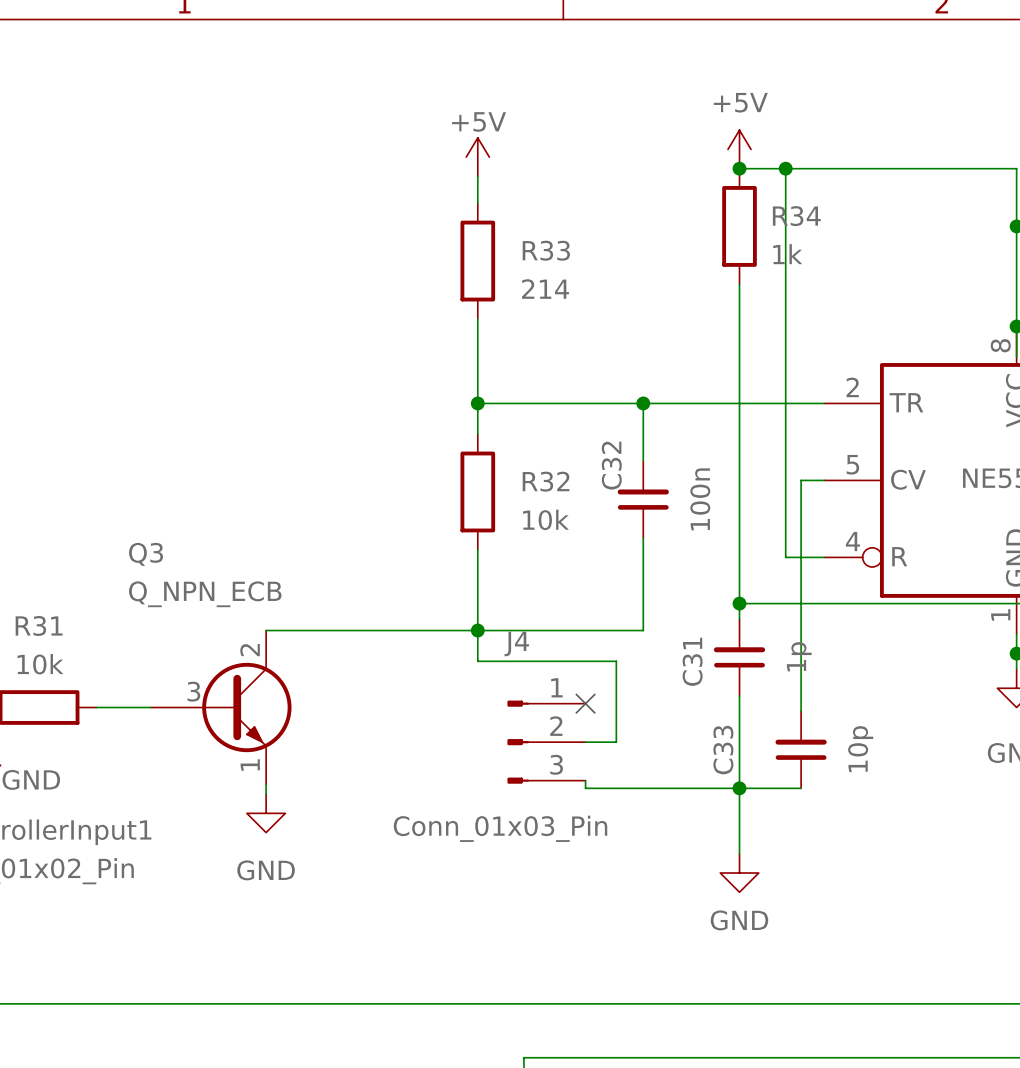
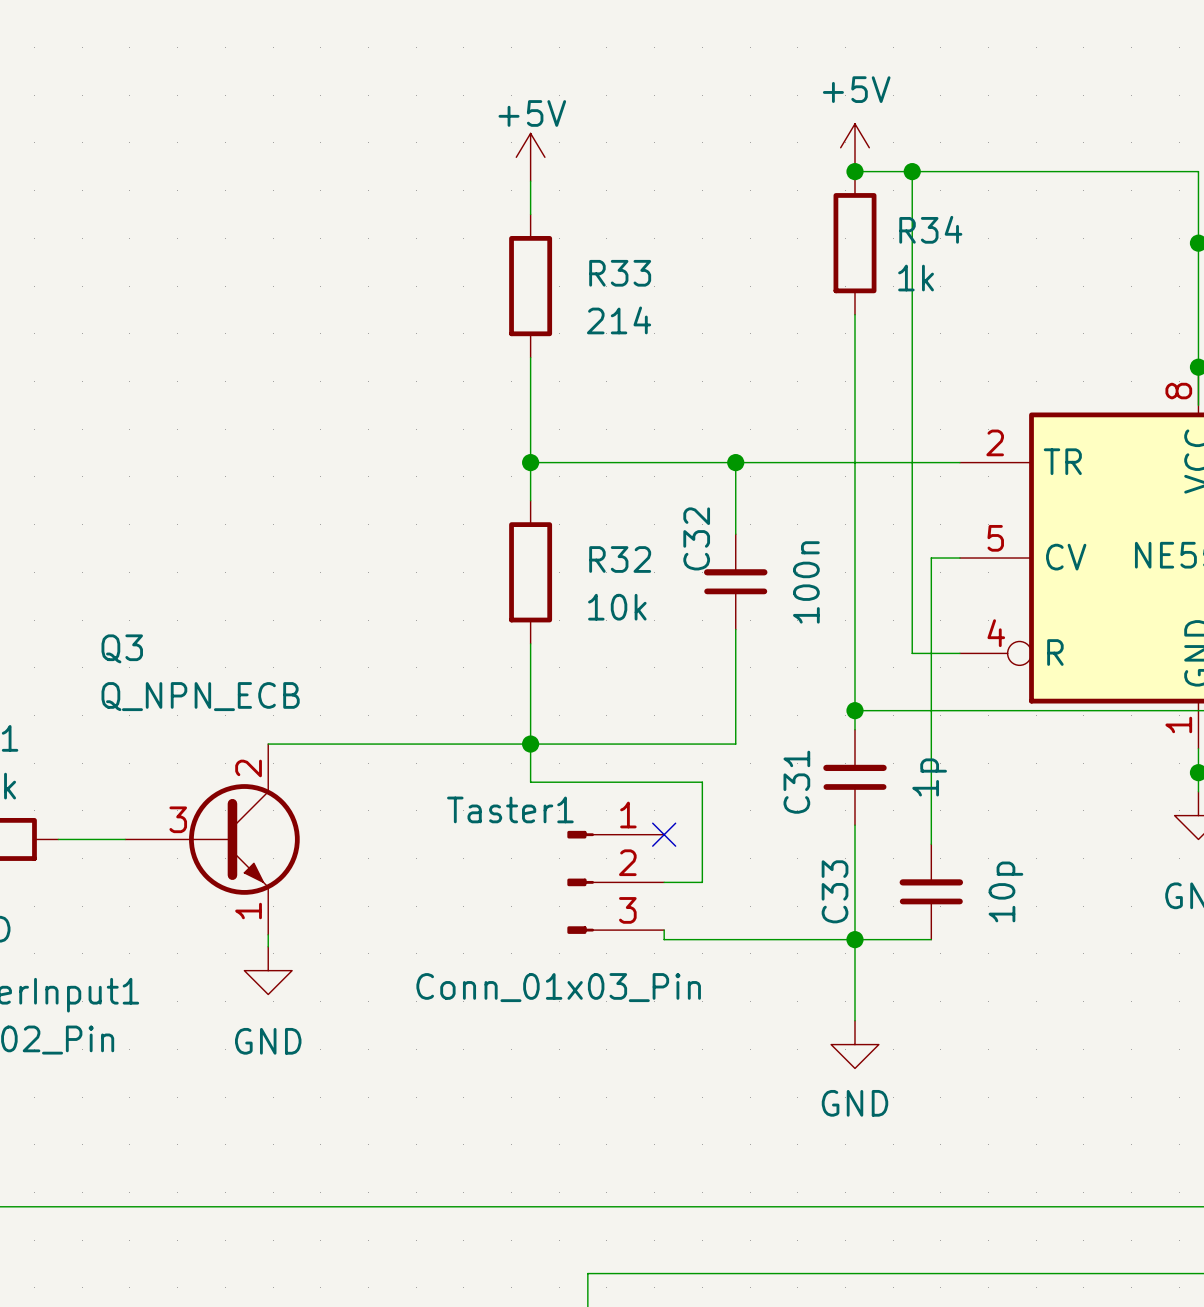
J4 name: J4 (516, 644) -> Taster1 (510, 809)

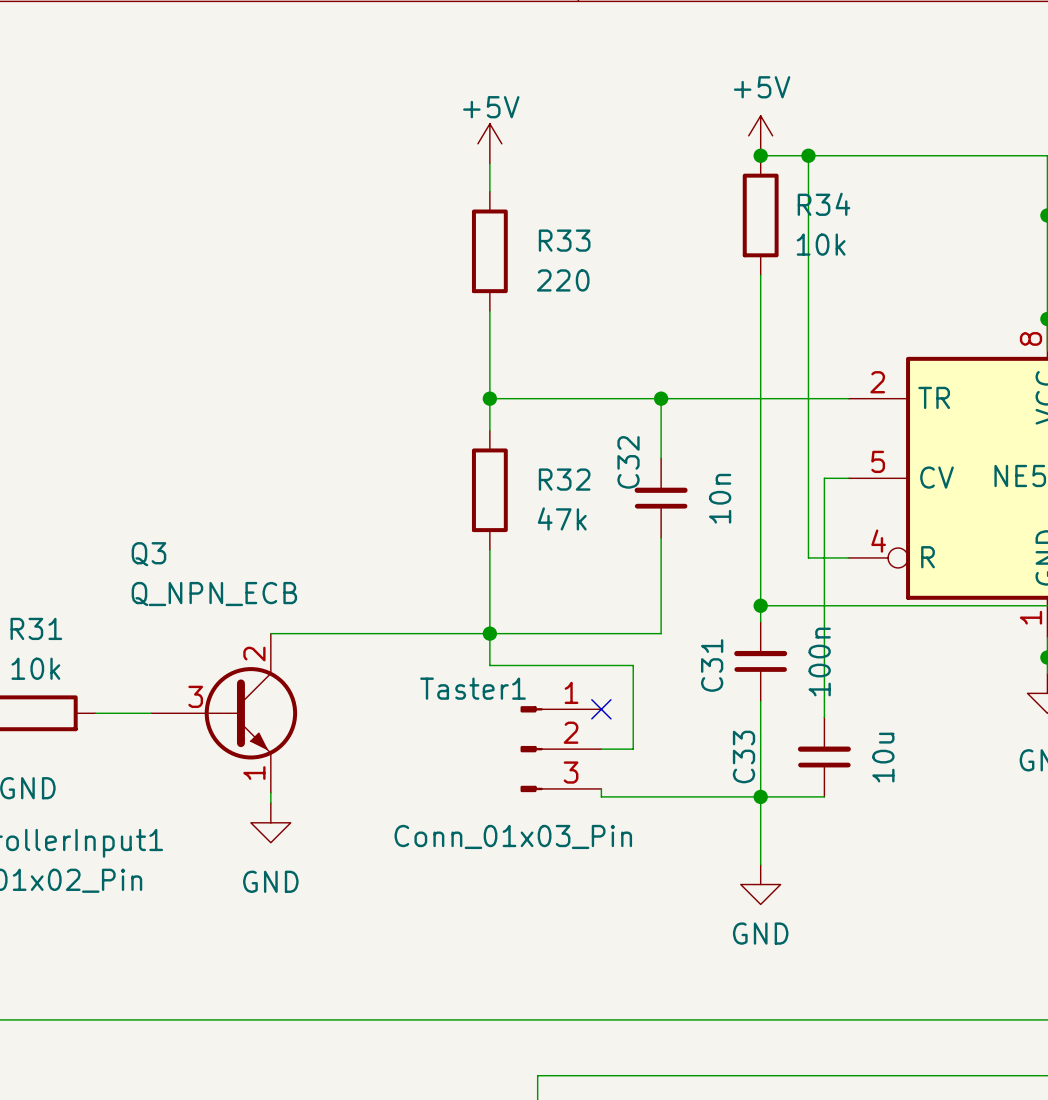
R34 value: 1k (916, 278) -> 10k (821, 244)
R33 value: 214 (619, 320) -> 220 (563, 280)
C32 value: 100n (806, 582) -> 10n (720, 498)
R32 value: 10k (617, 607) -> 47k (562, 518)
C31 value: 1p (929, 777) -> 100n (819, 661)
C33 value: 10p (1005, 891) -> 10u (883, 757)

